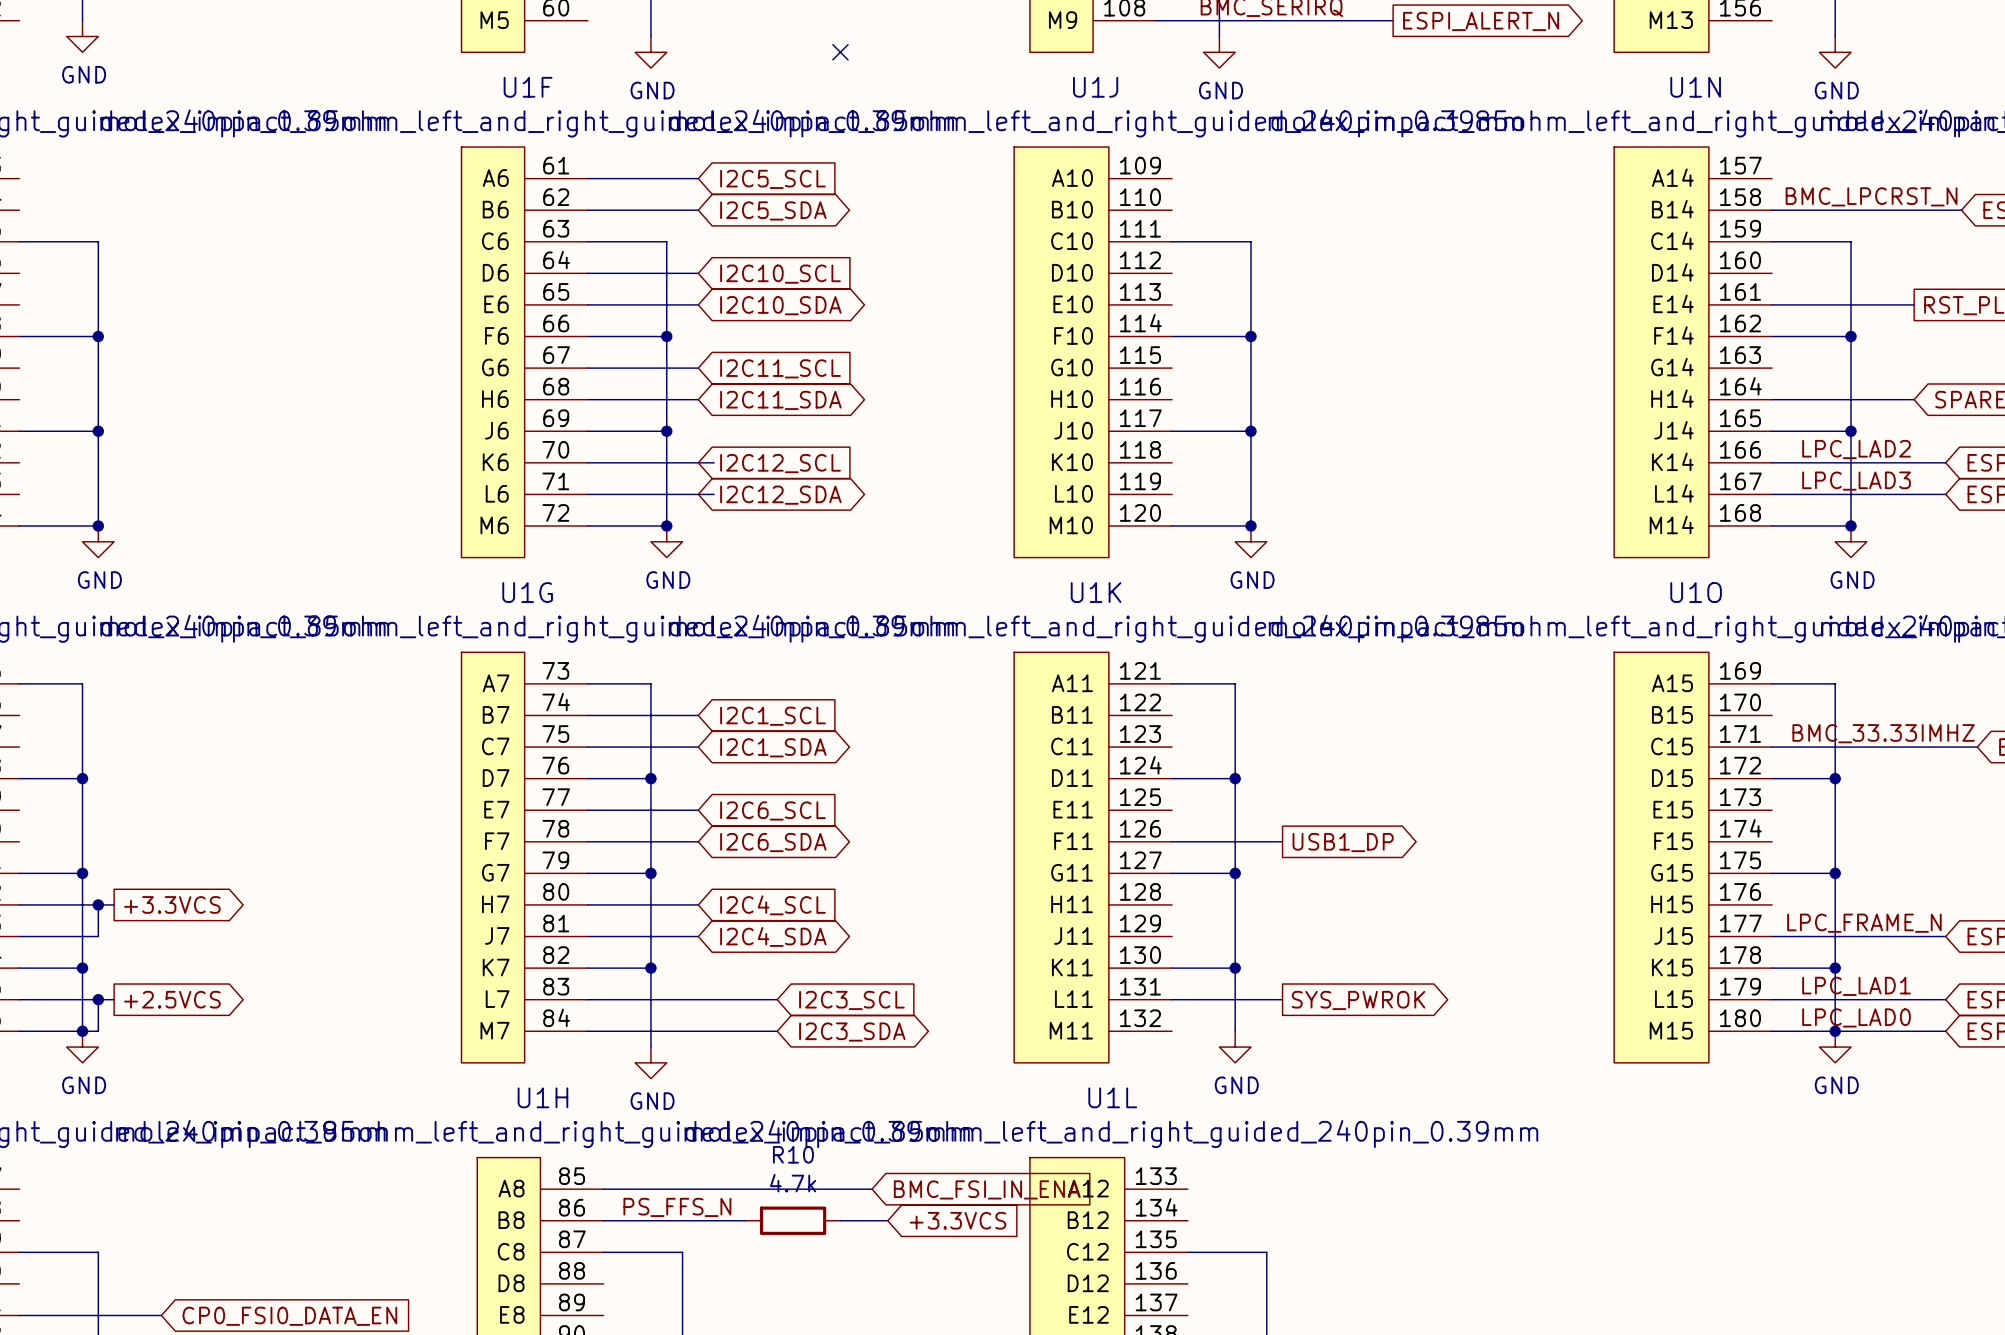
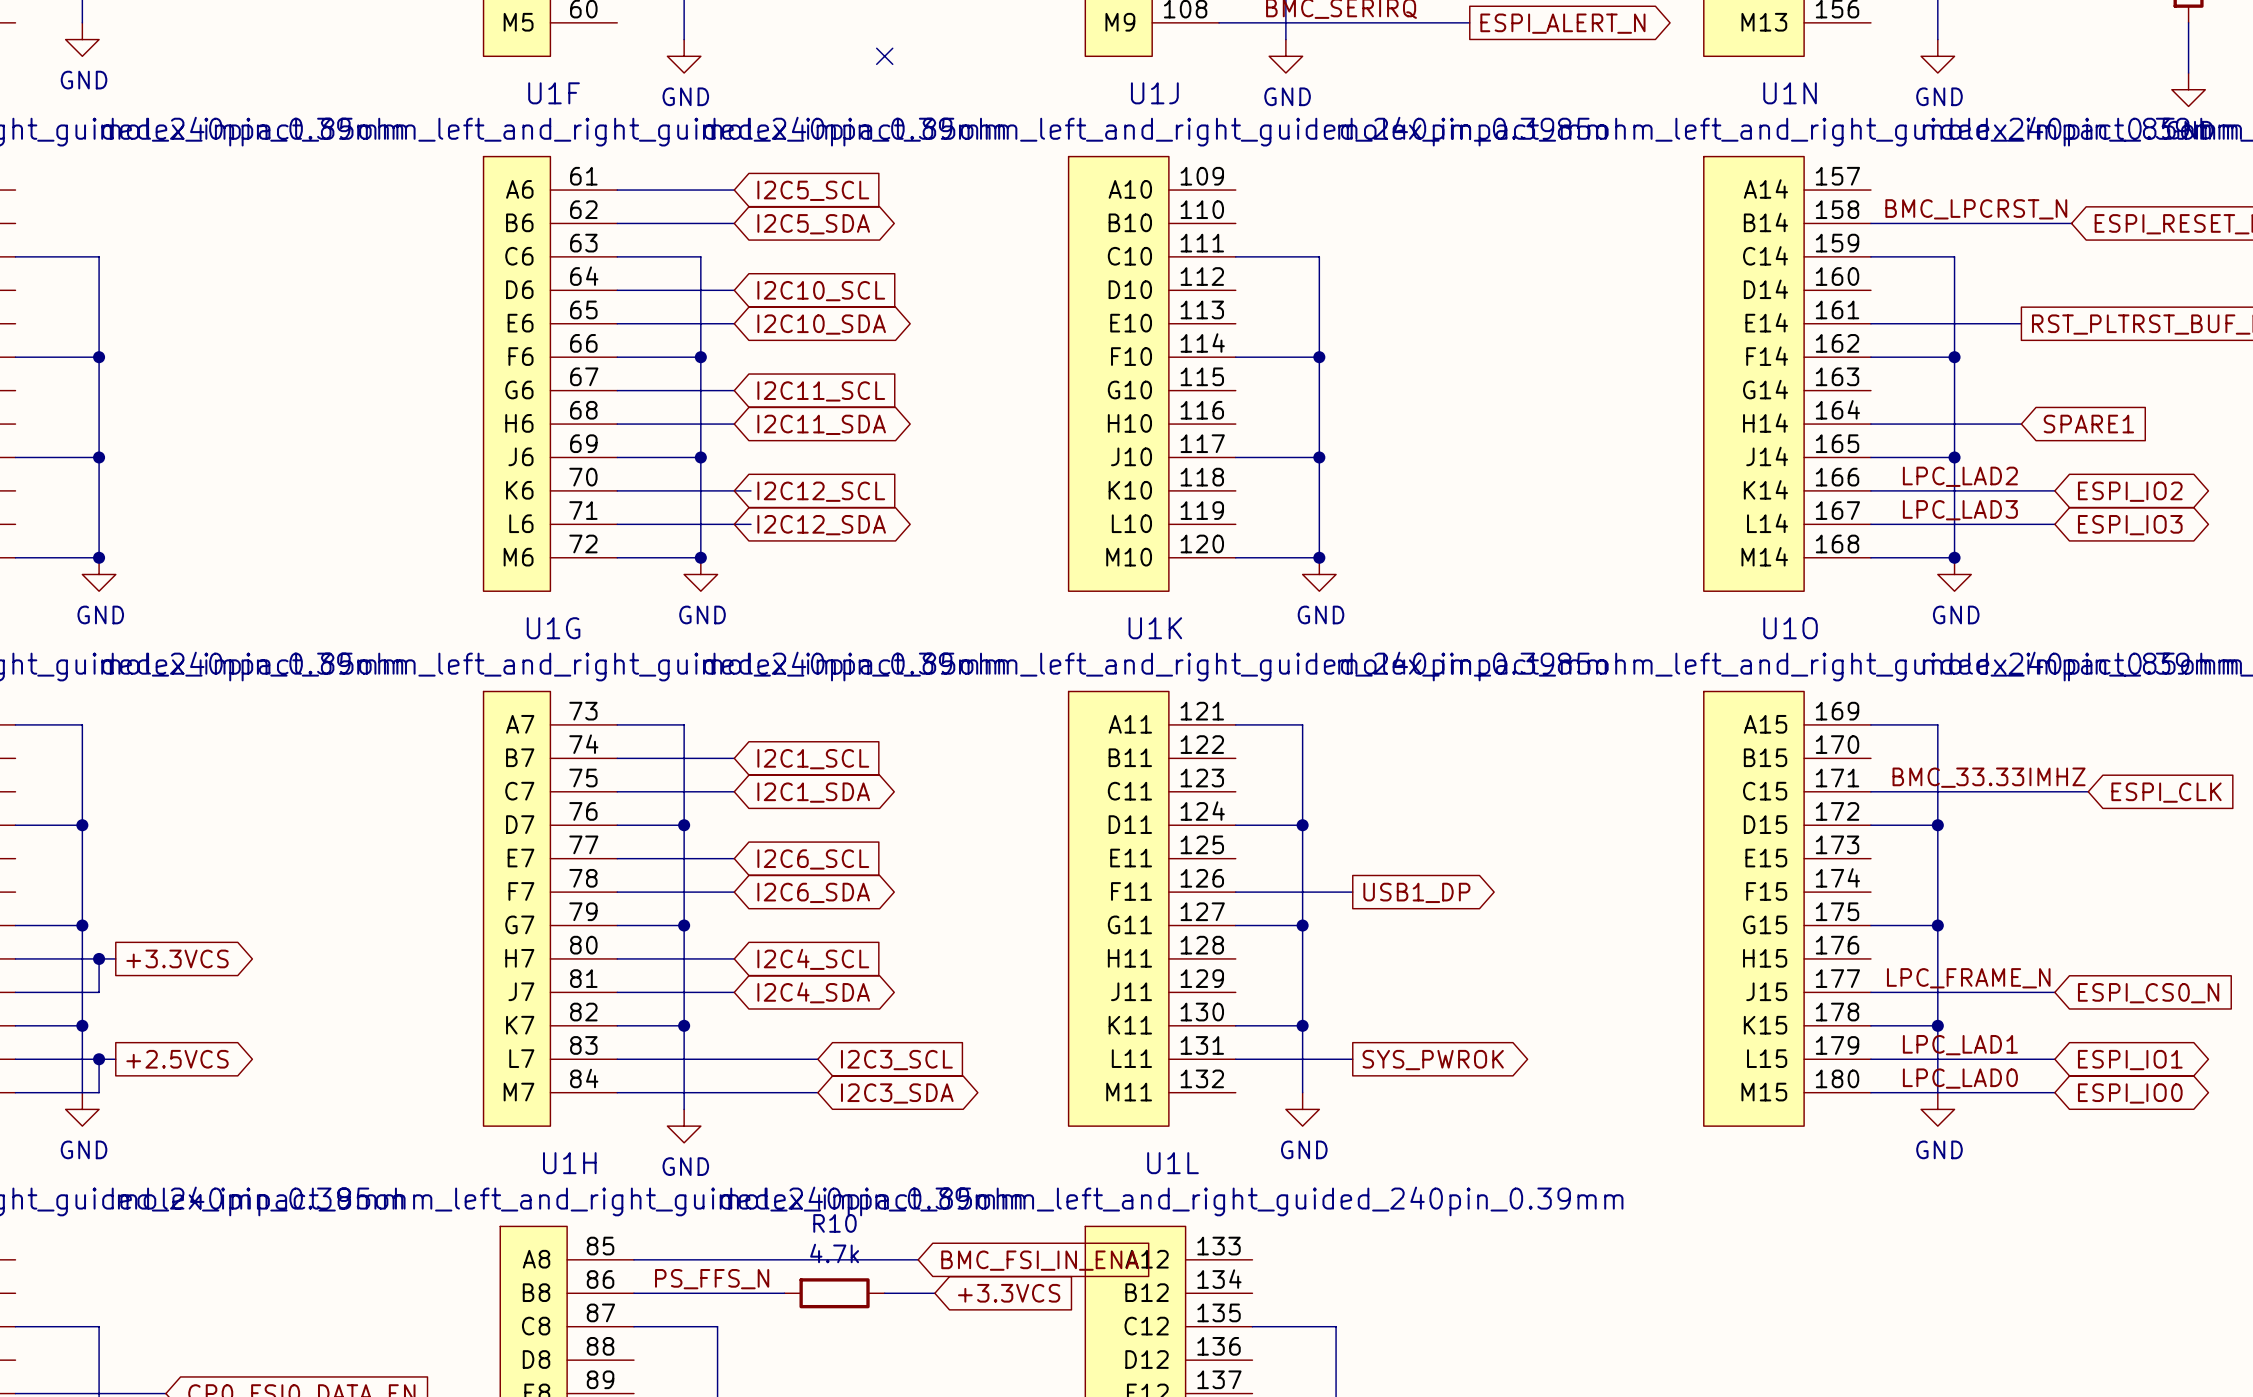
junction: (82, 1031) -> none
junction: (1835, 1031) -> none

